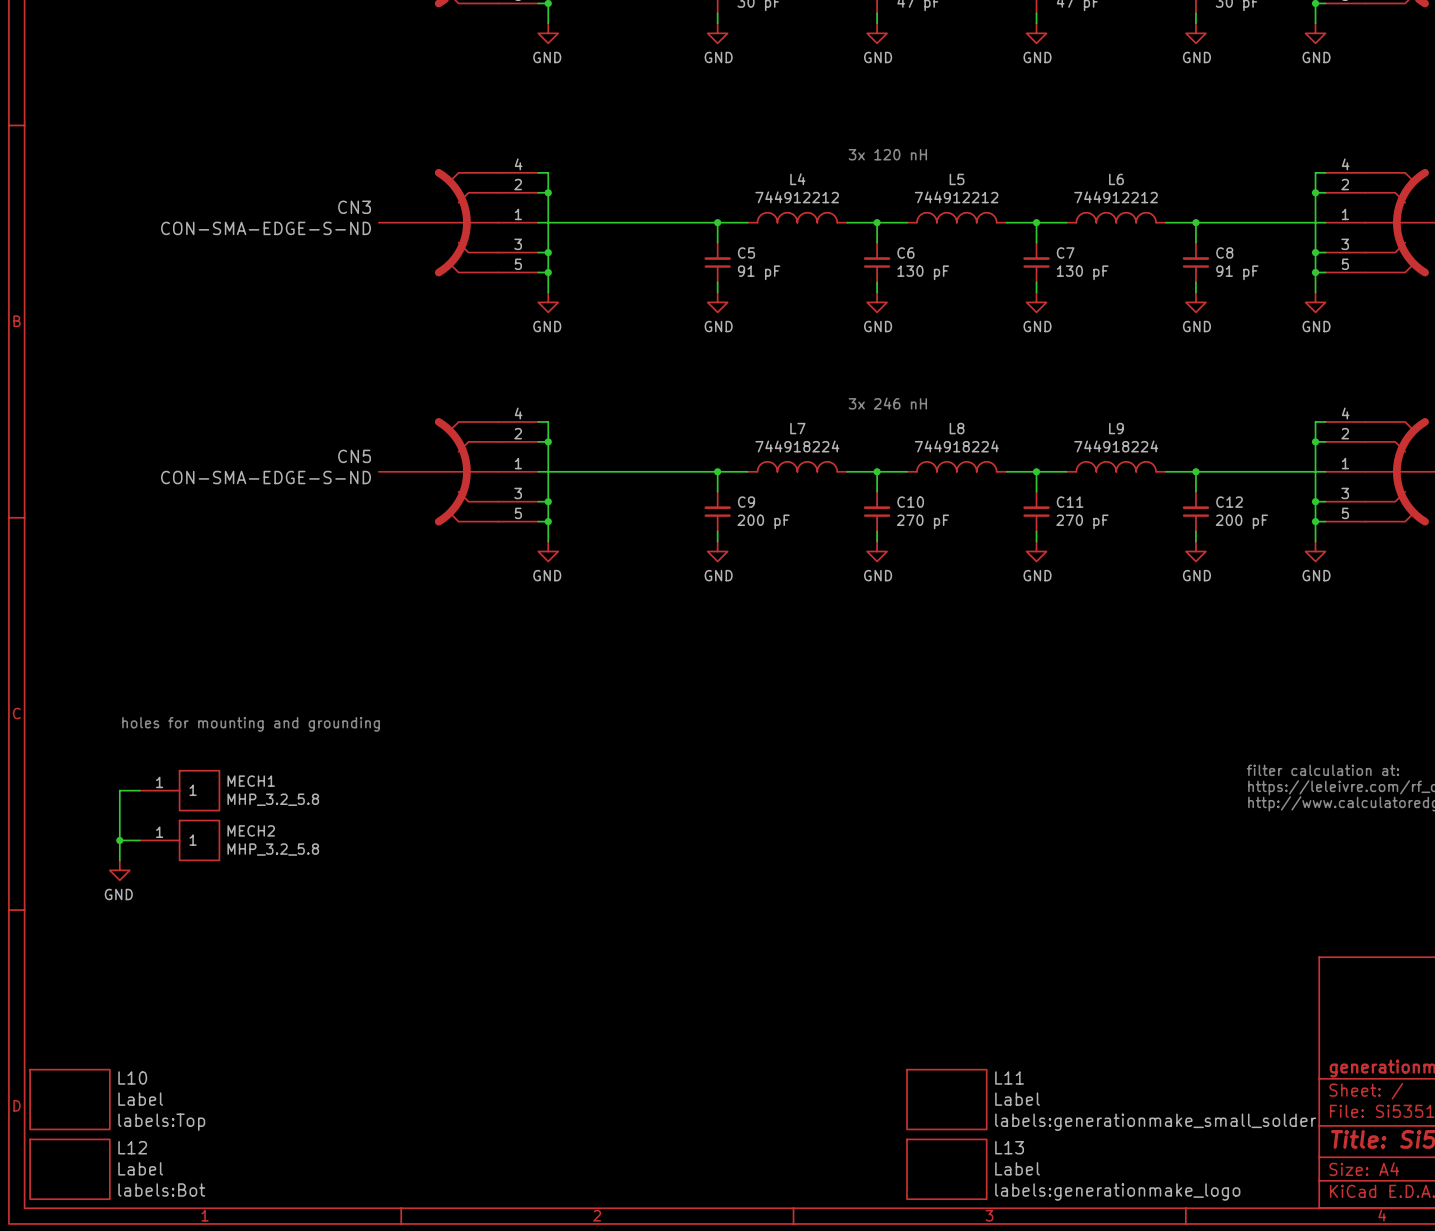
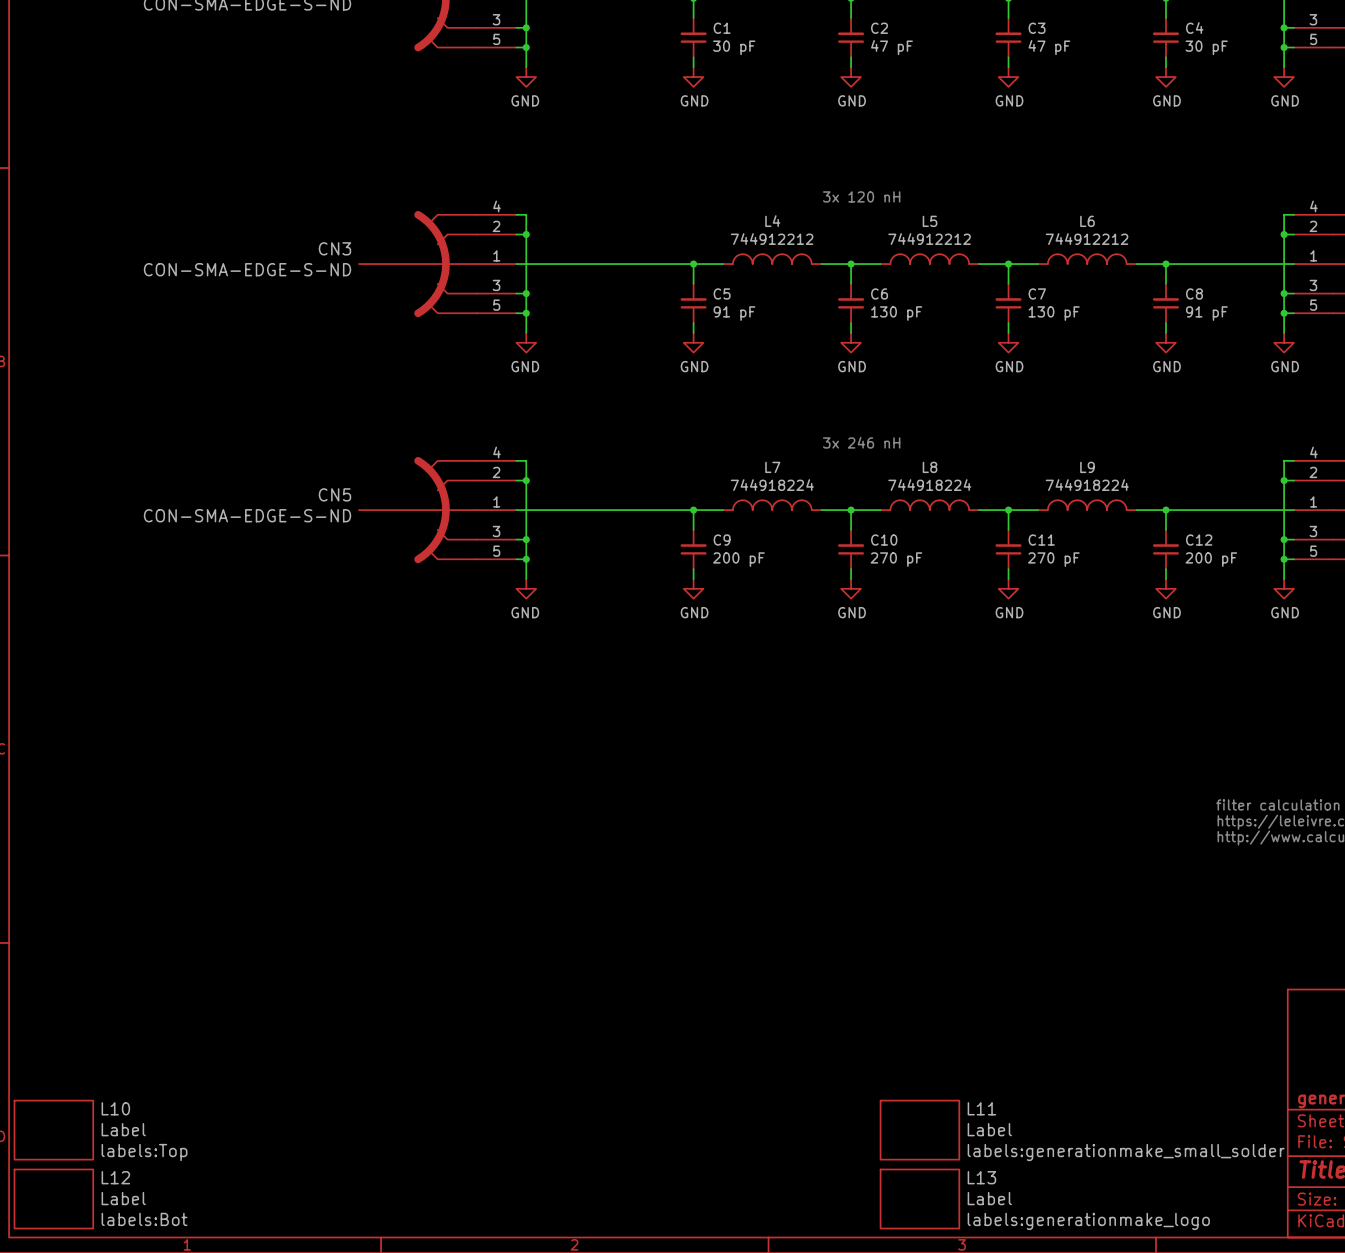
text: holes for mounting and grounding (251, 724) -> none
wire: (139, 790) (119, 790) (119, 860) -> none
MECH1: MHP_3.2_5.8 (179, 790) -> none
wire: (119, 840) (139, 840) -> none
junction: (119, 840) -> none
MECH2: MHP_3.2_5.8 (179, 840) -> none
power symbol: GND (119, 870) -> none

